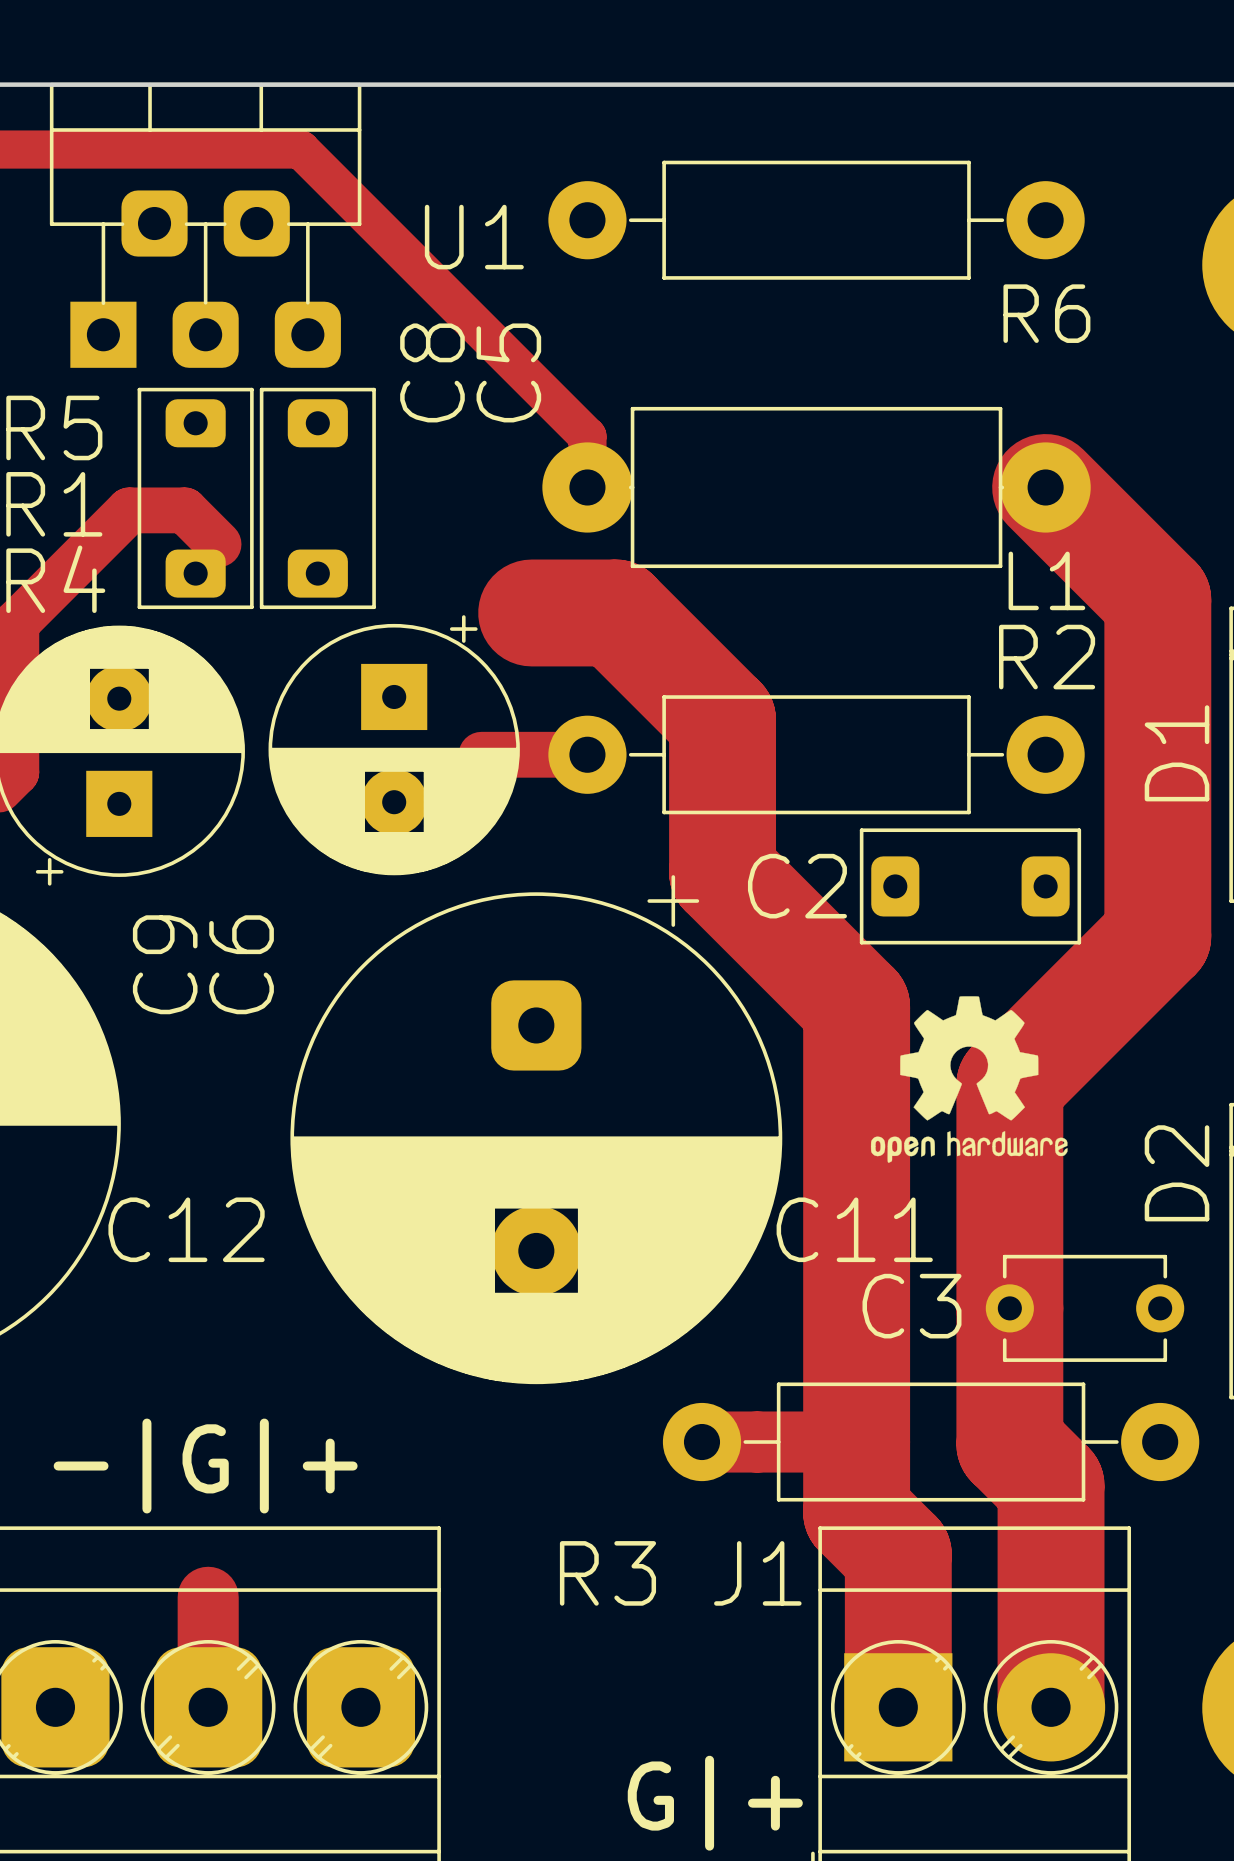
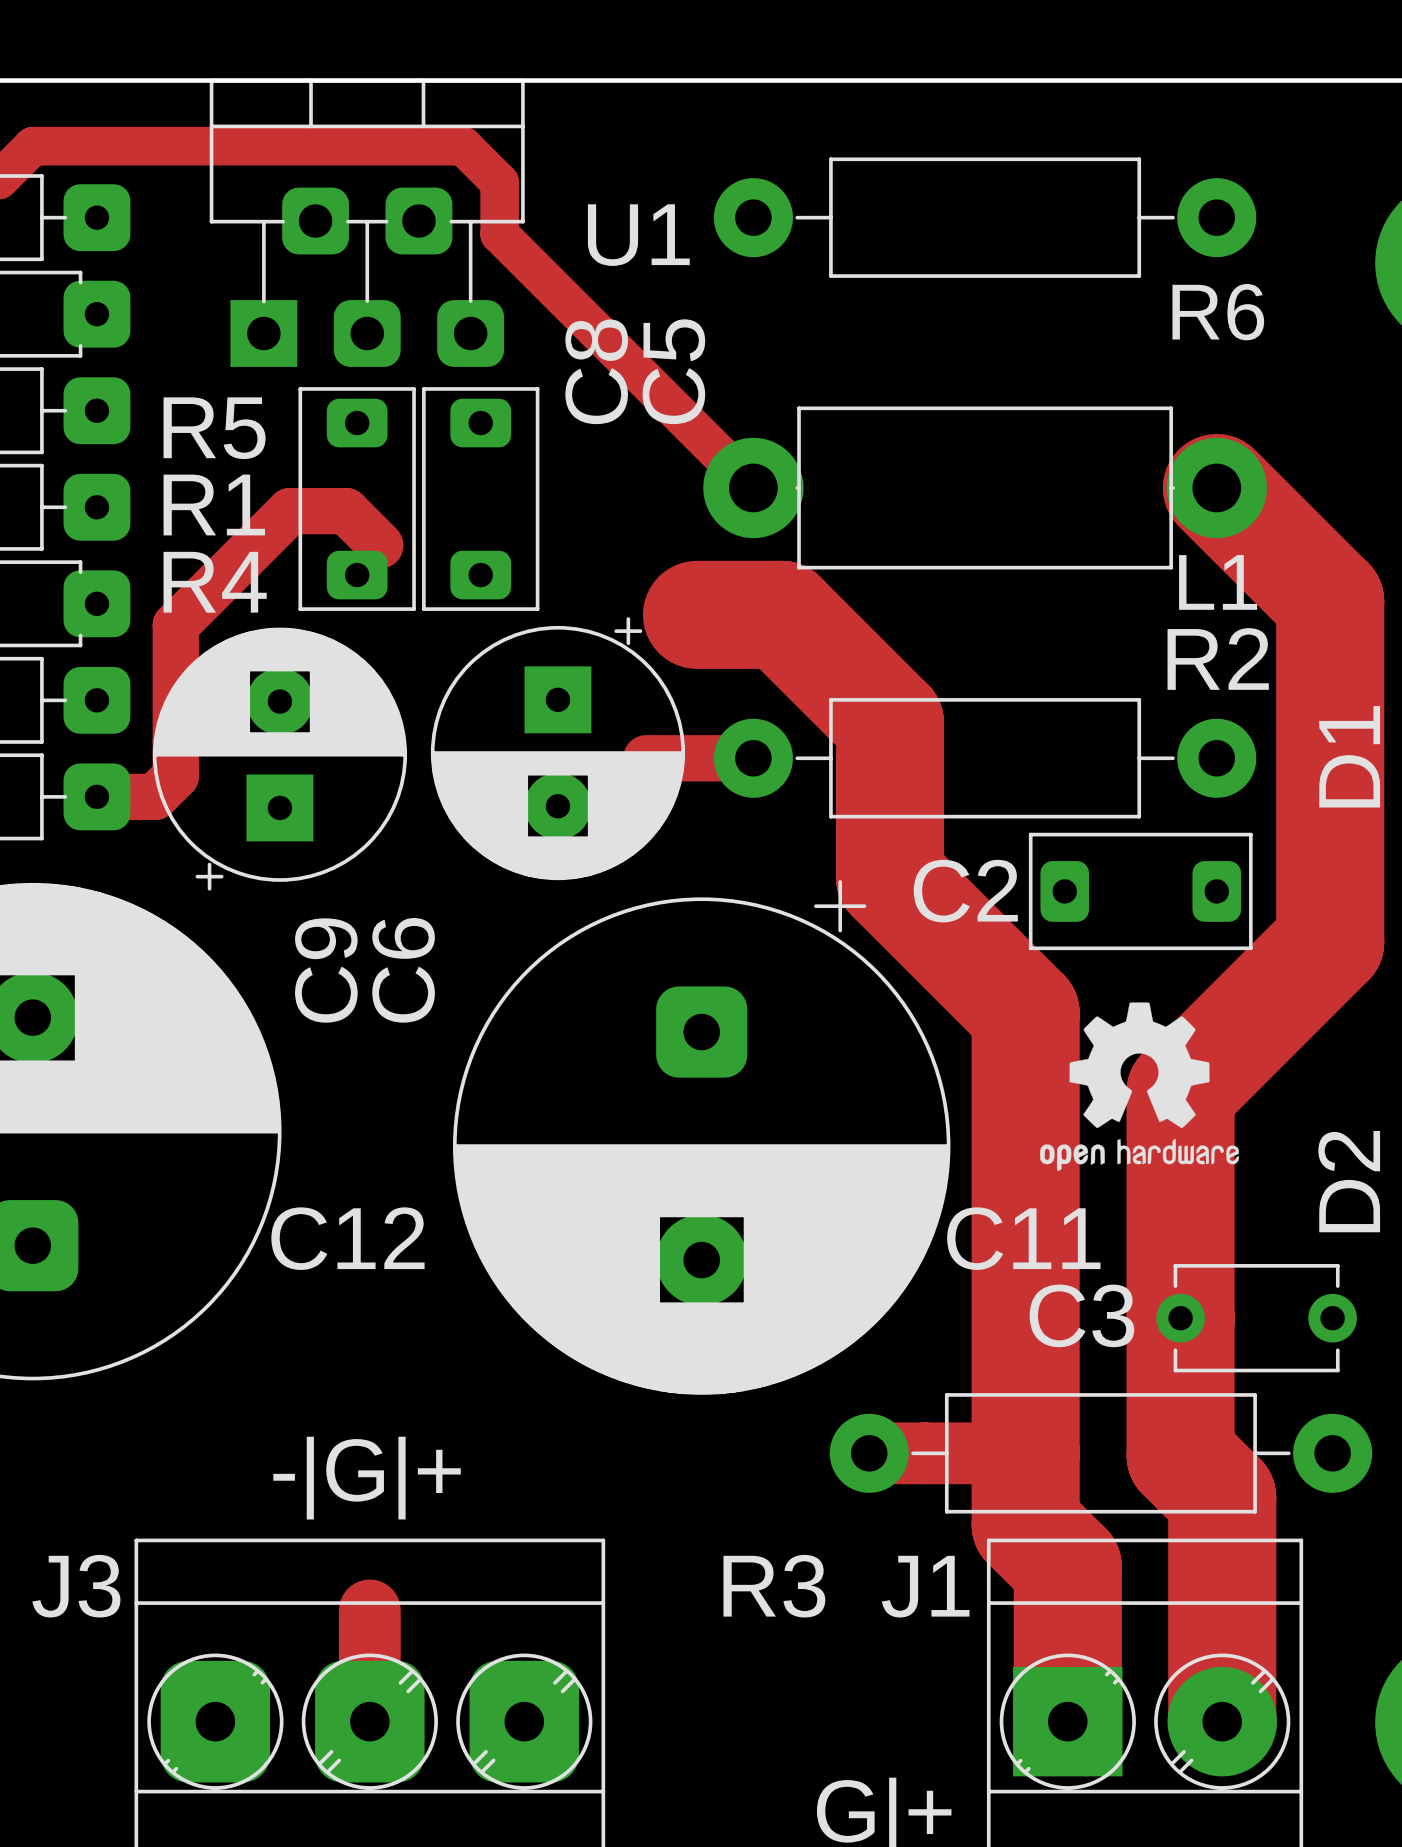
track: (336, 185) (587, 436) (587, 487) -> (499, 182) (499, 234) (753, 487)
L1 footprint: [542, 406, 1091, 569] -> [703, 406, 1267, 570]

